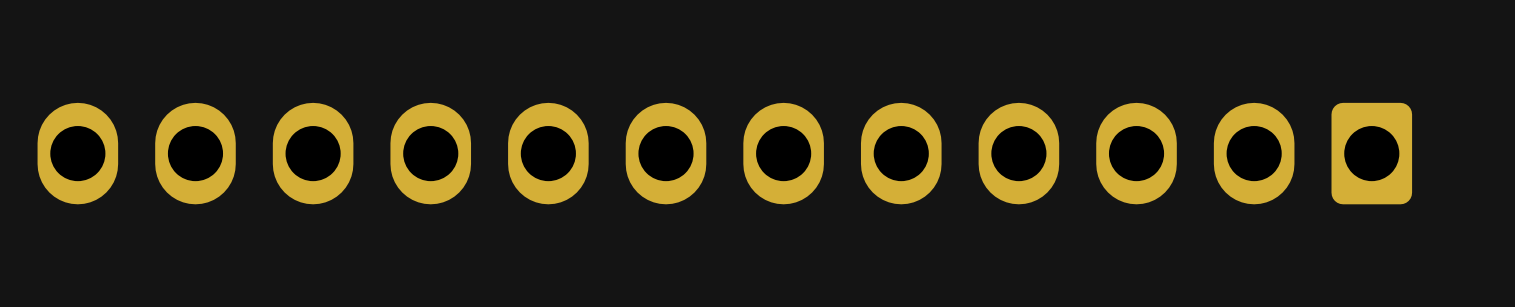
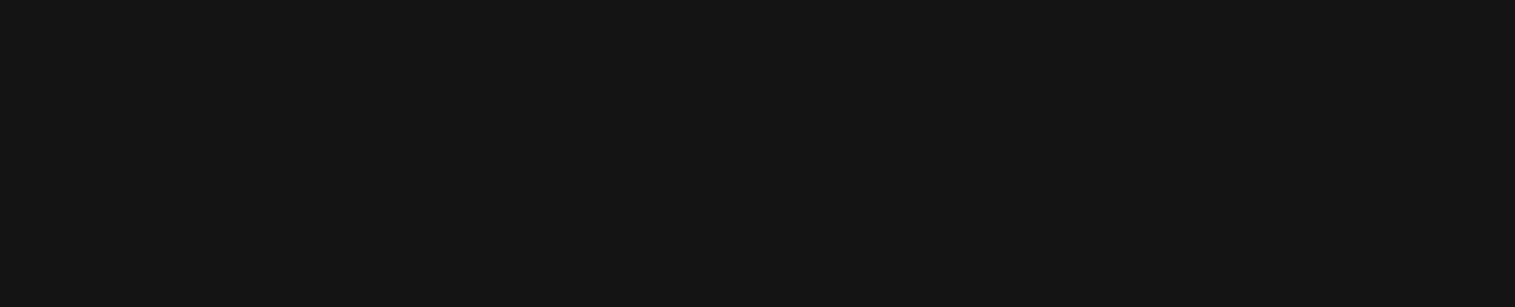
part: (724, 153) -> none

